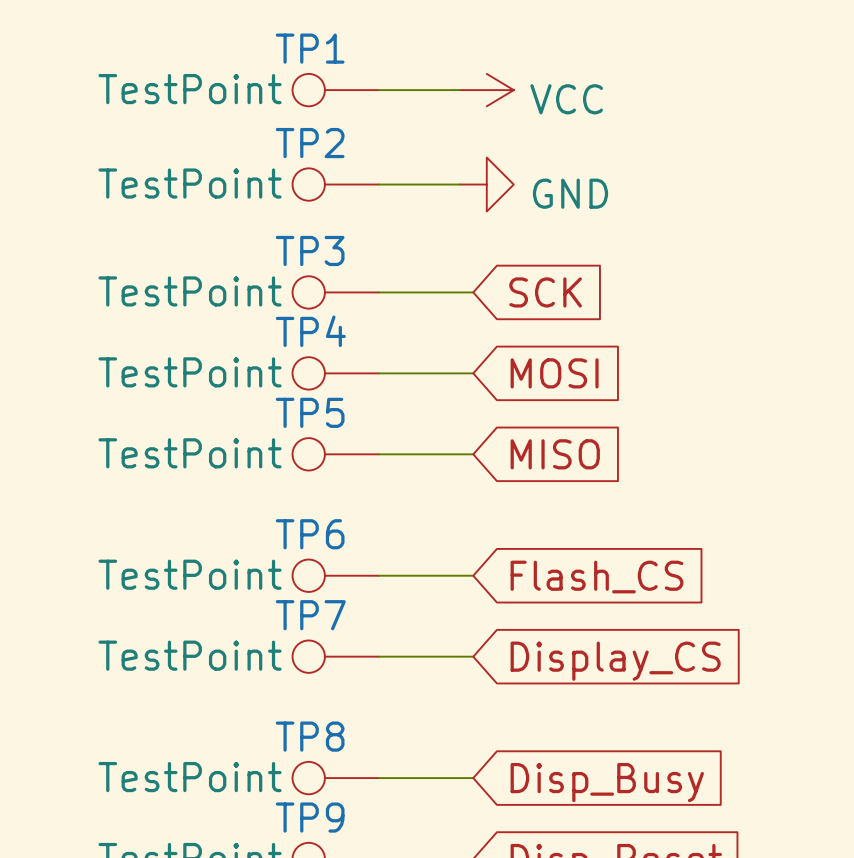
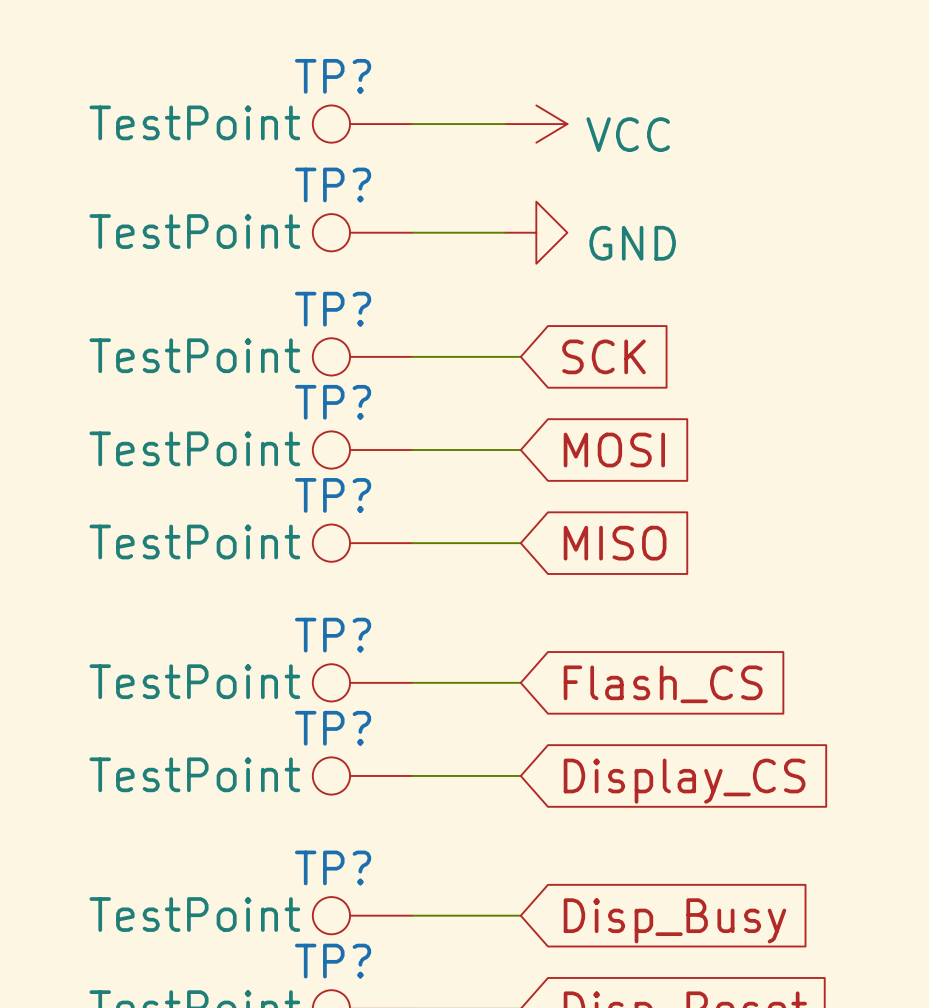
TP1 name: TP1 (310, 48) -> TP? (333, 76)
TP2 name: TP2 (310, 143) -> TP? (333, 184)
TP3 name: TP3 (310, 250) -> TP? (333, 309)
TP4 name: TP4 (310, 331) -> TP? (333, 402)
TP5 name: TP5 (310, 412) -> TP? (333, 495)
TP6 name: TP6 (310, 534) -> TP? (333, 635)
TP7 name: TP7 (310, 615) -> TP? (333, 728)
TP8 name: TP8 (310, 736) -> TP? (333, 867)
TP9 name: TP9 (310, 817) -> TP? (333, 961)

